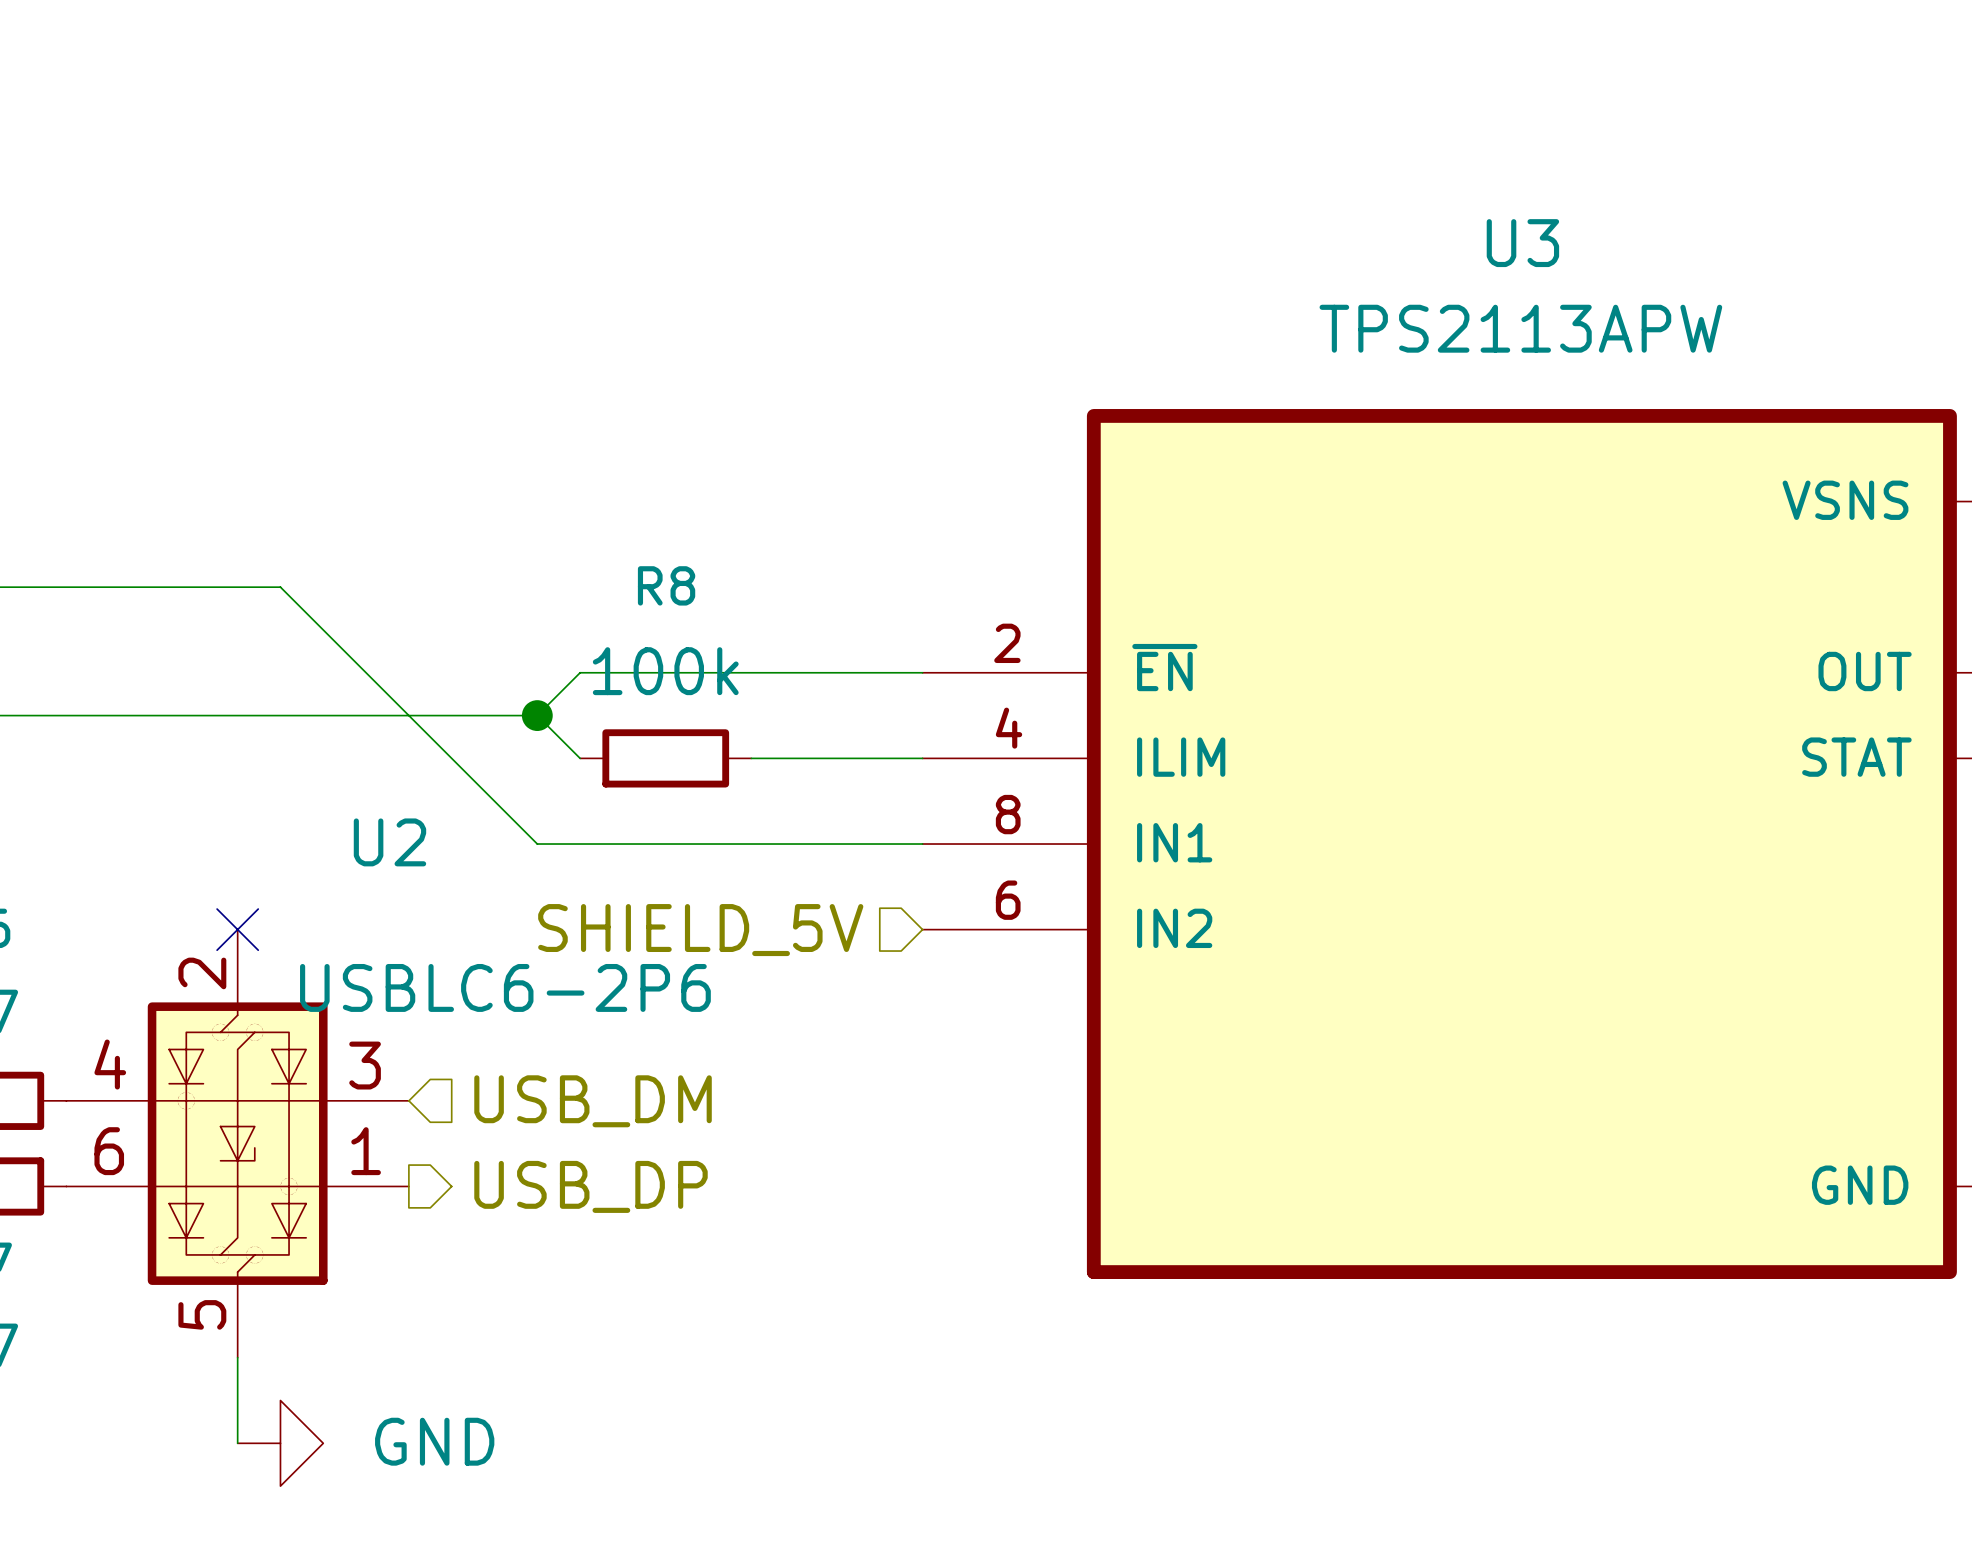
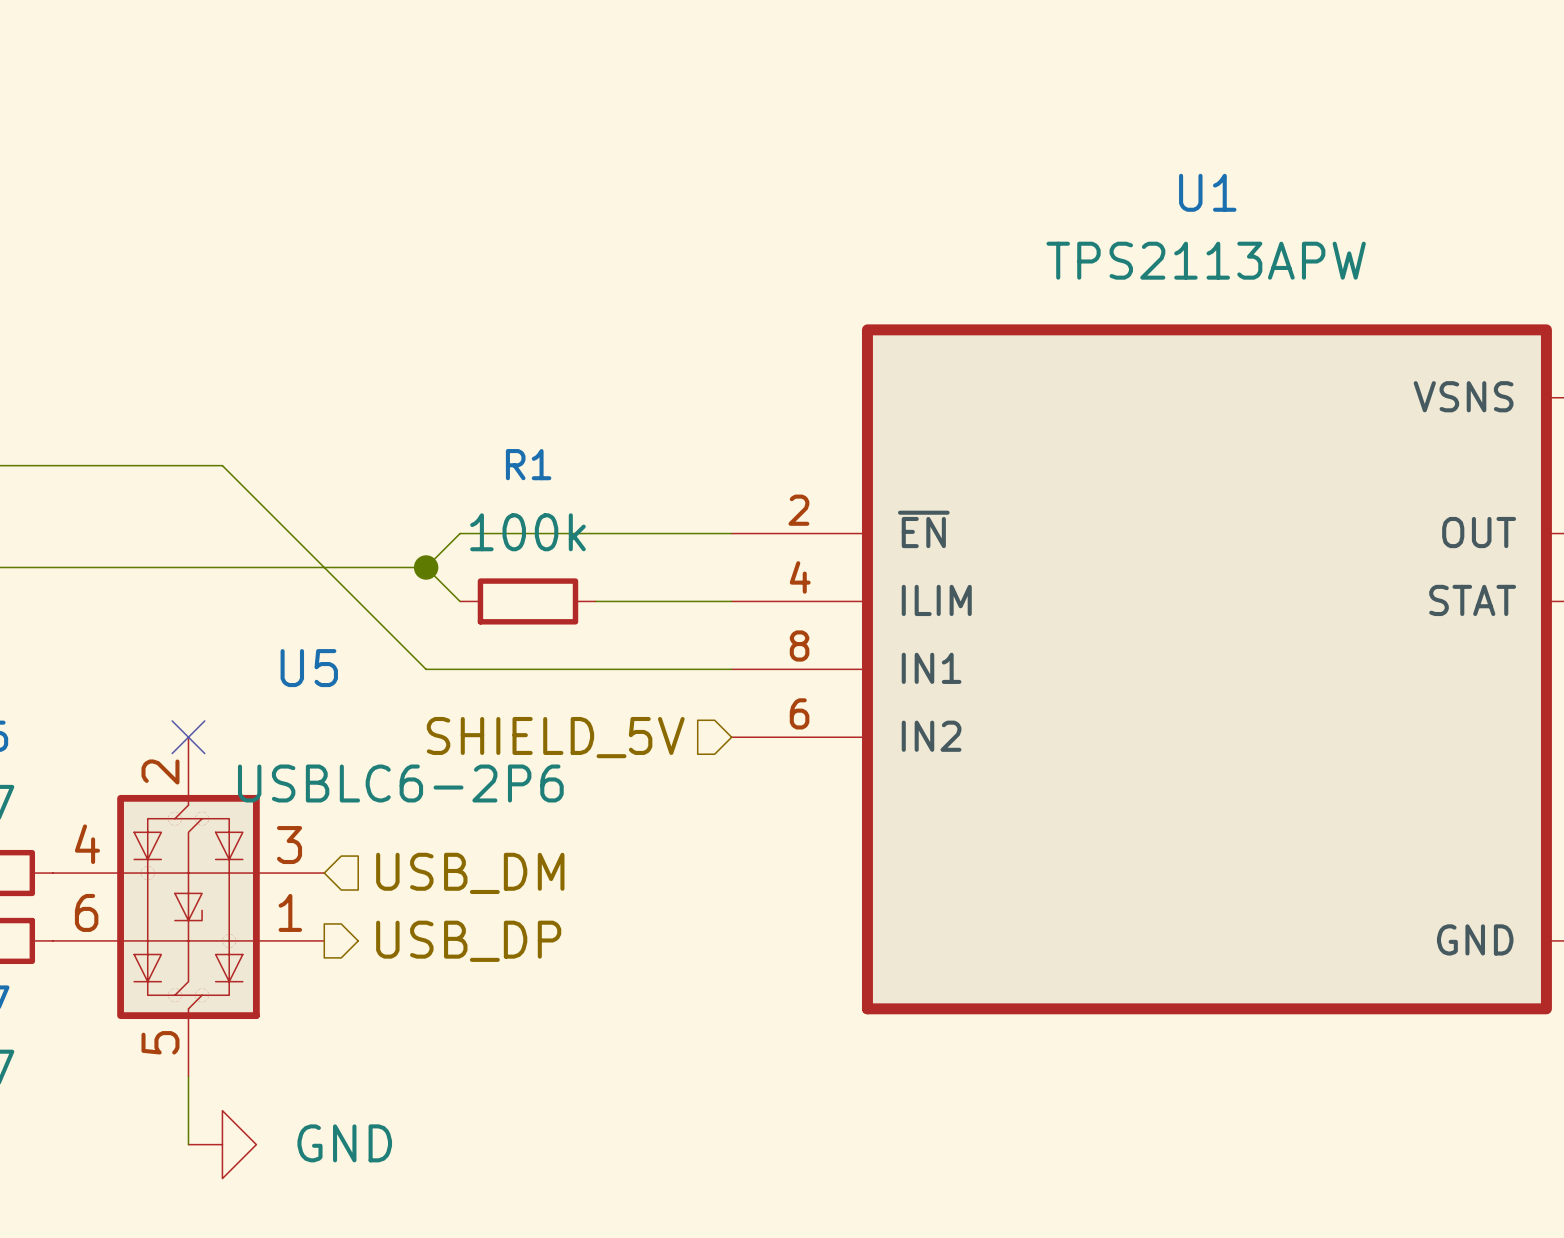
U3 name: U3 (1522, 243) -> U1 (1207, 192)
R8 name: R8 (666, 585) -> R1 (528, 464)
U2 name: U2 (389, 842) -> U5 (309, 668)

